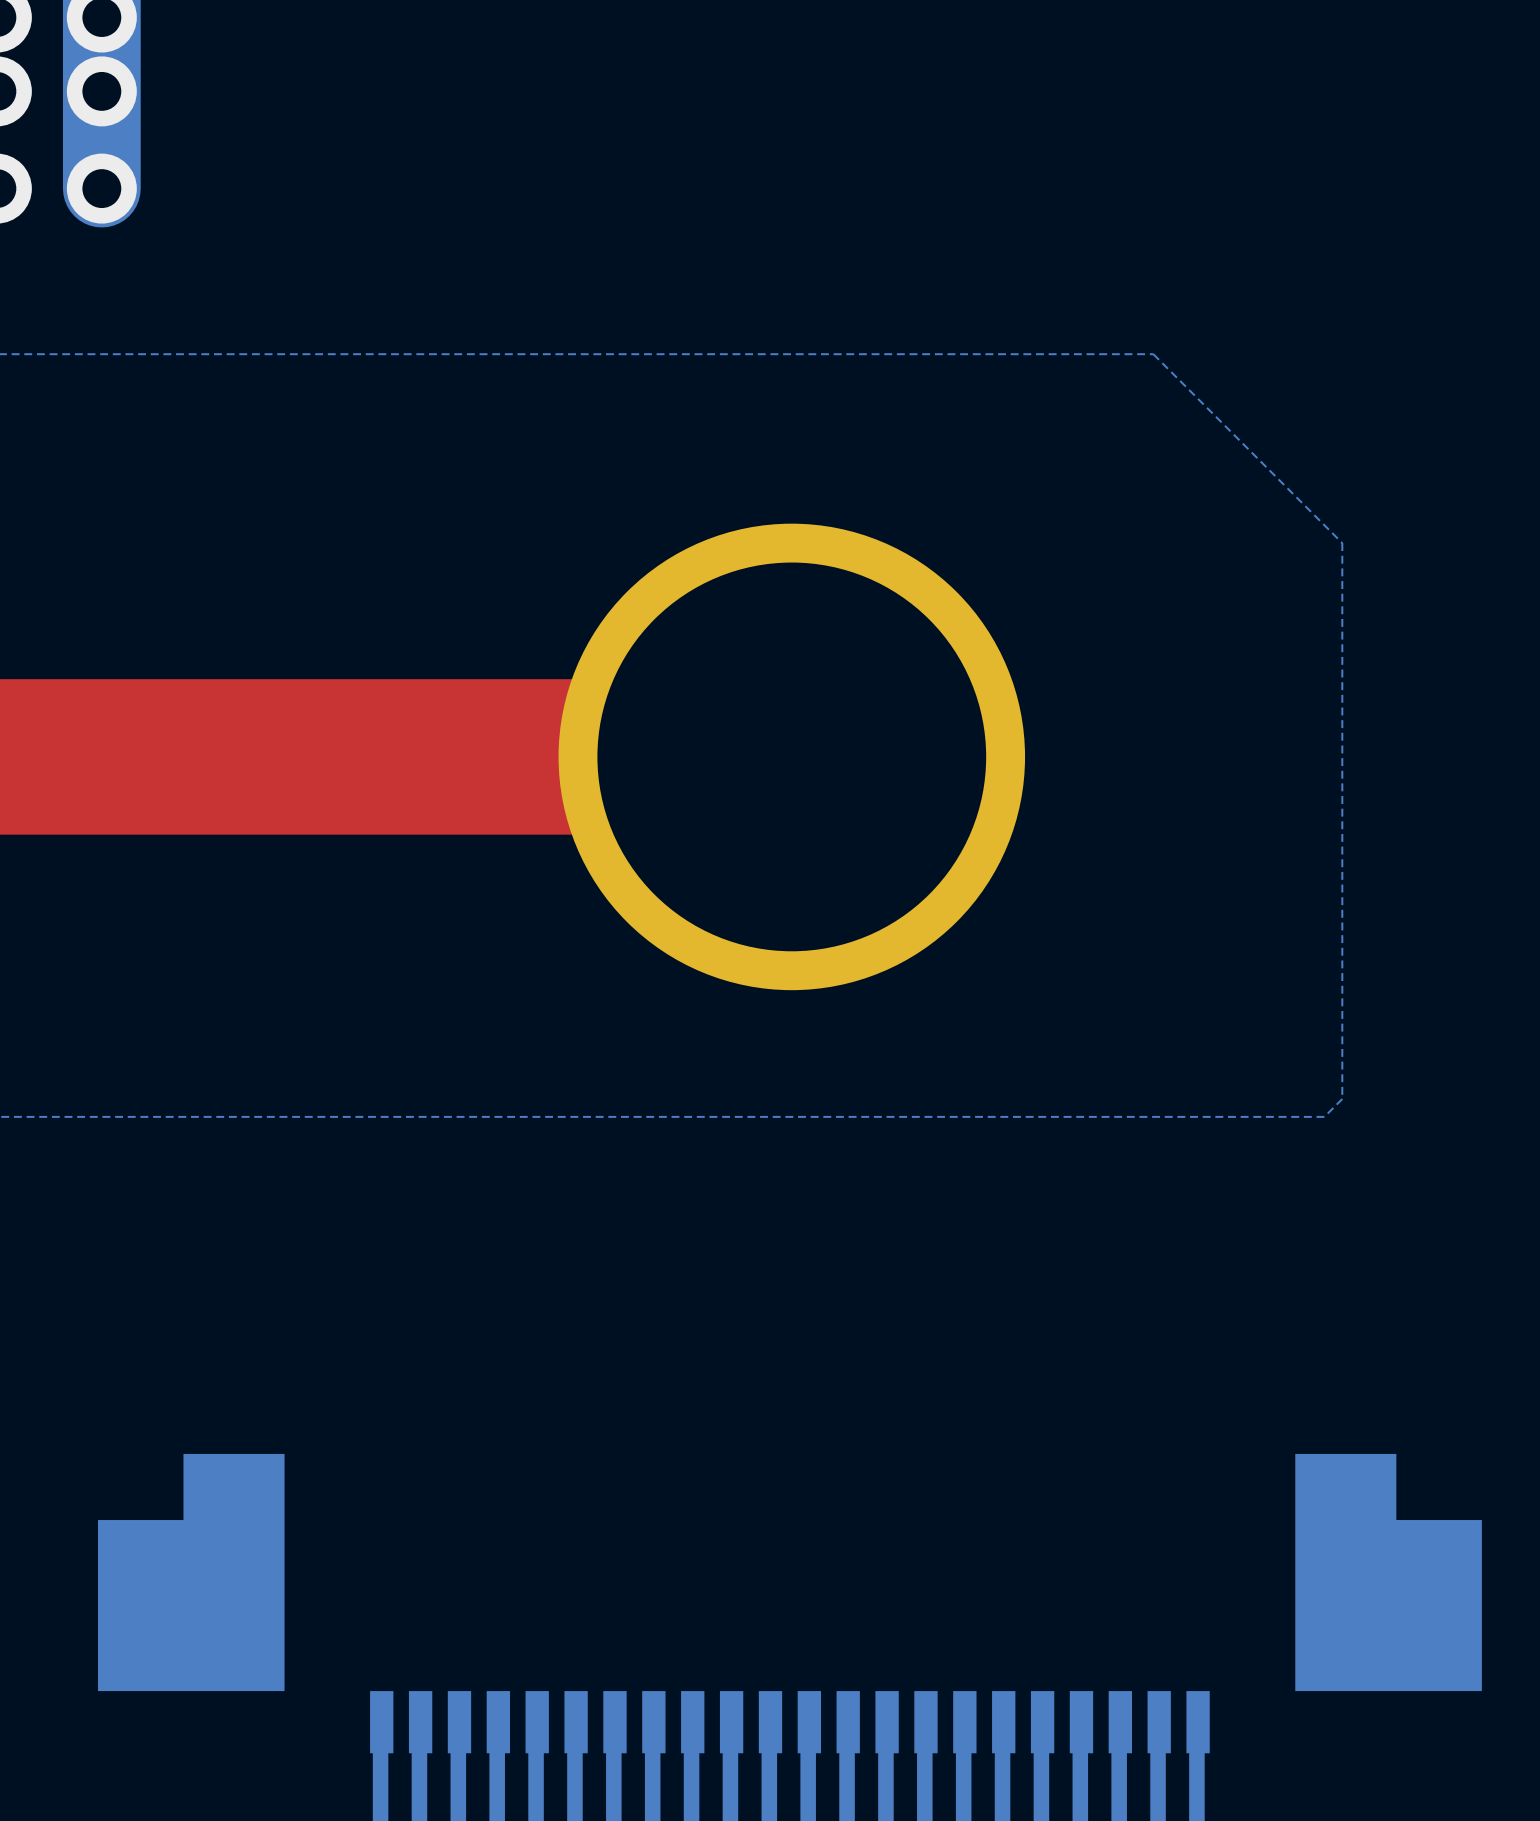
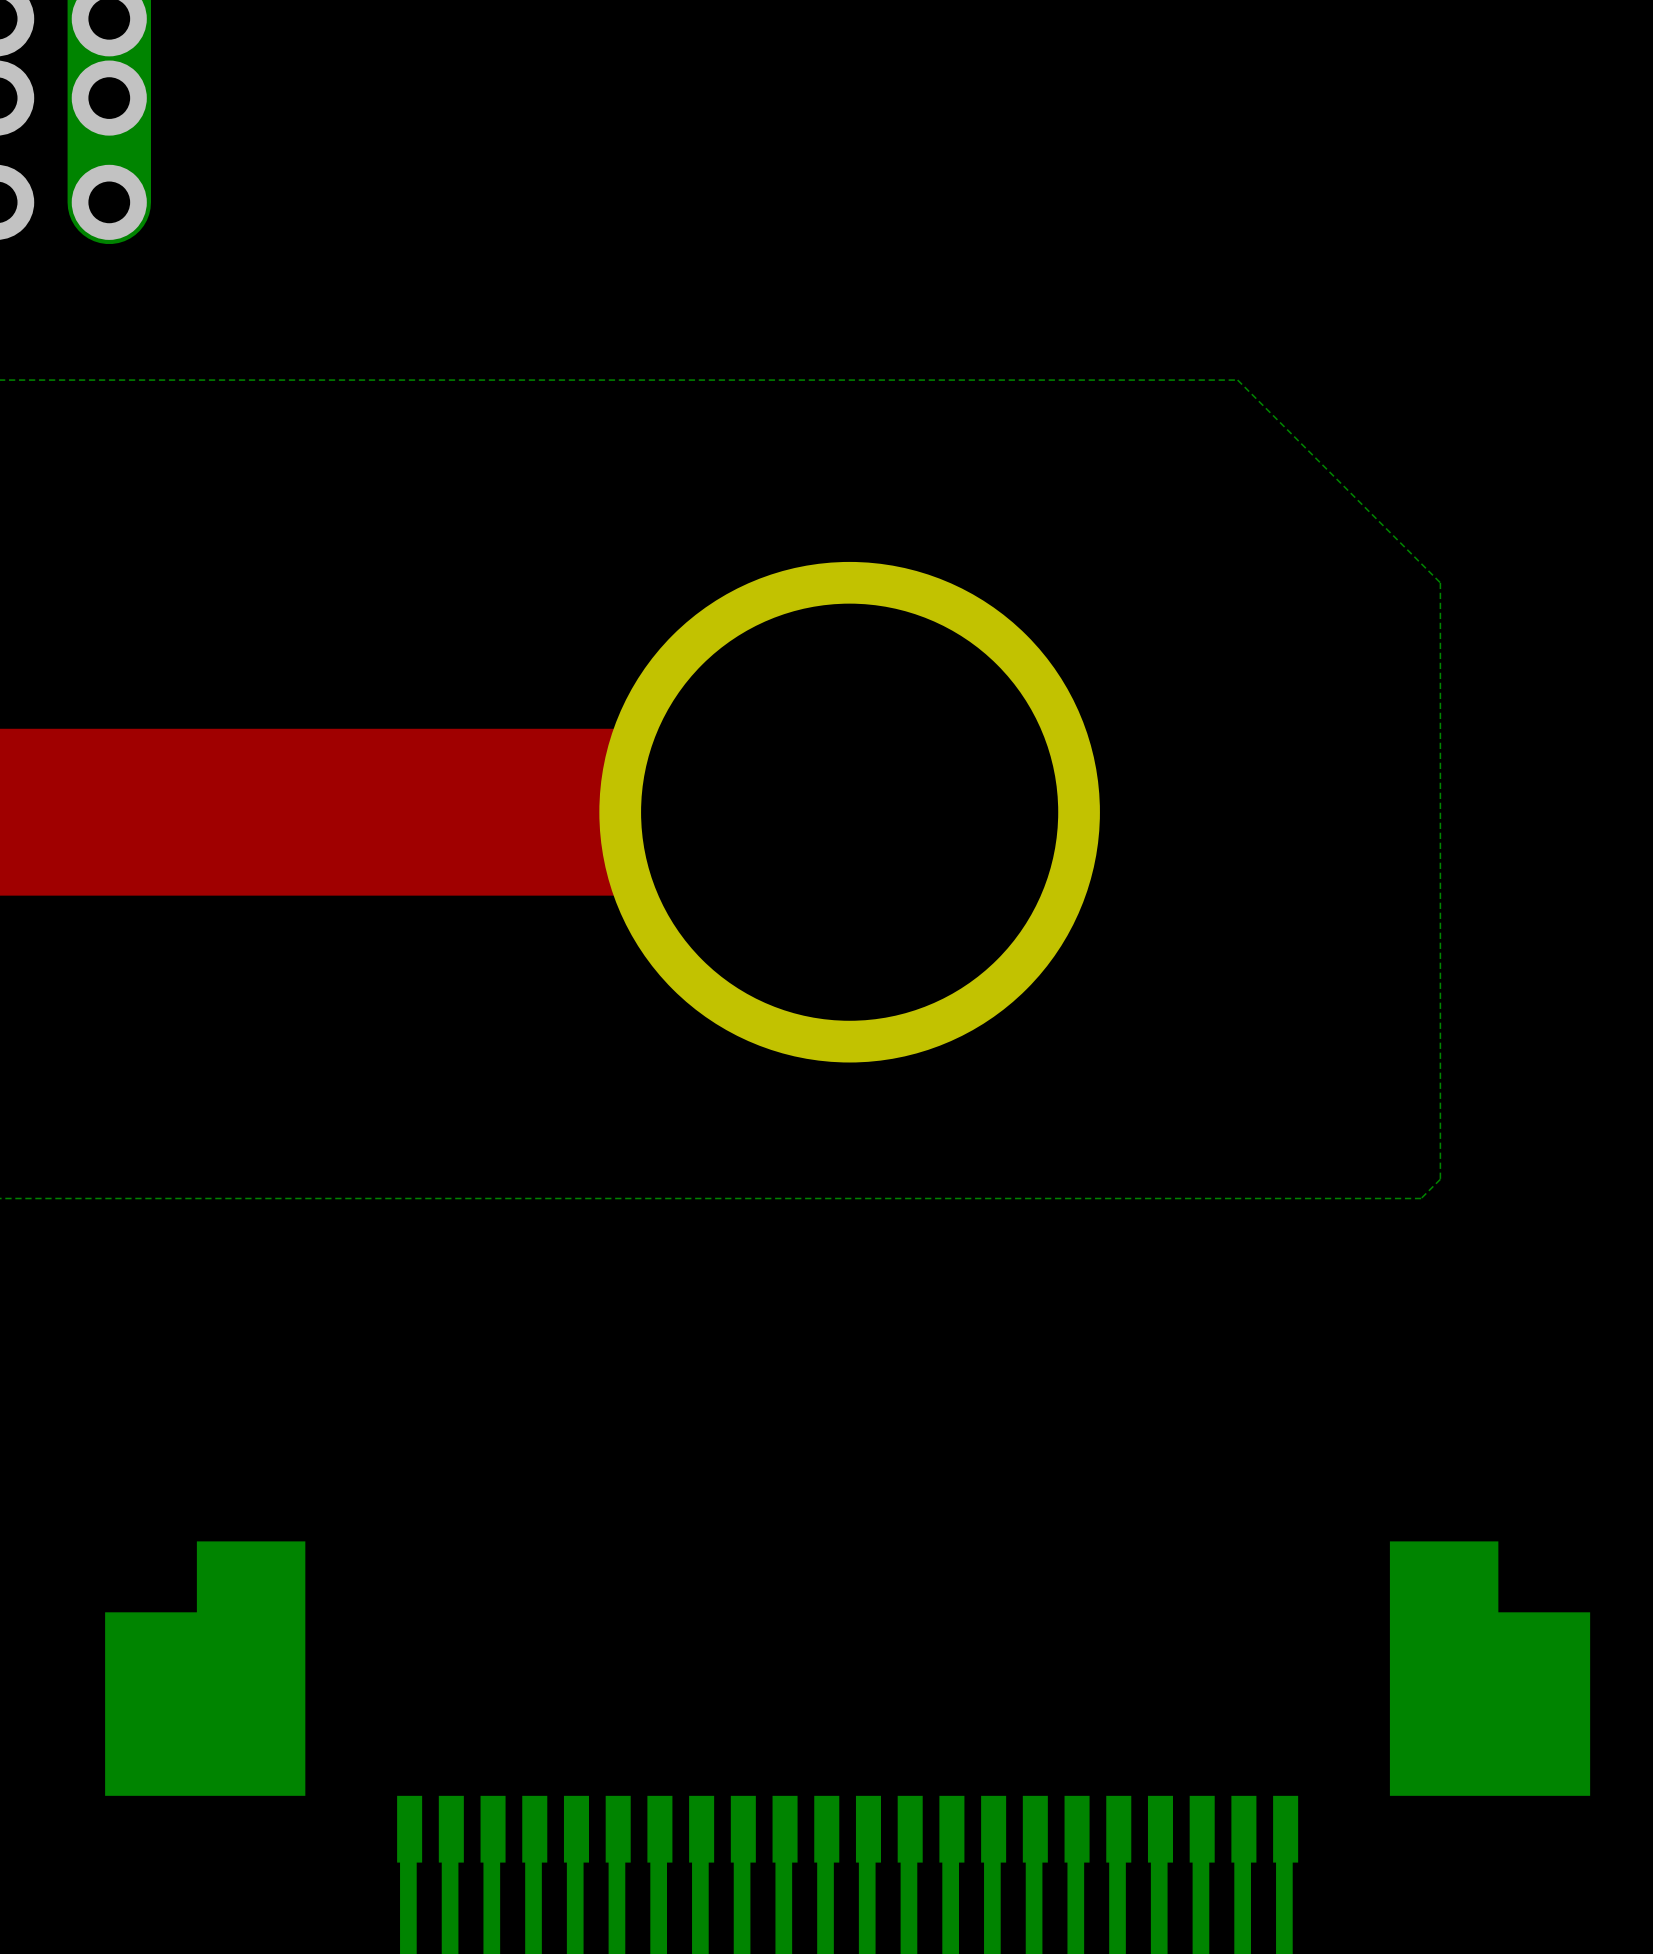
part position: (789, 1603) -> (847, 1701)

